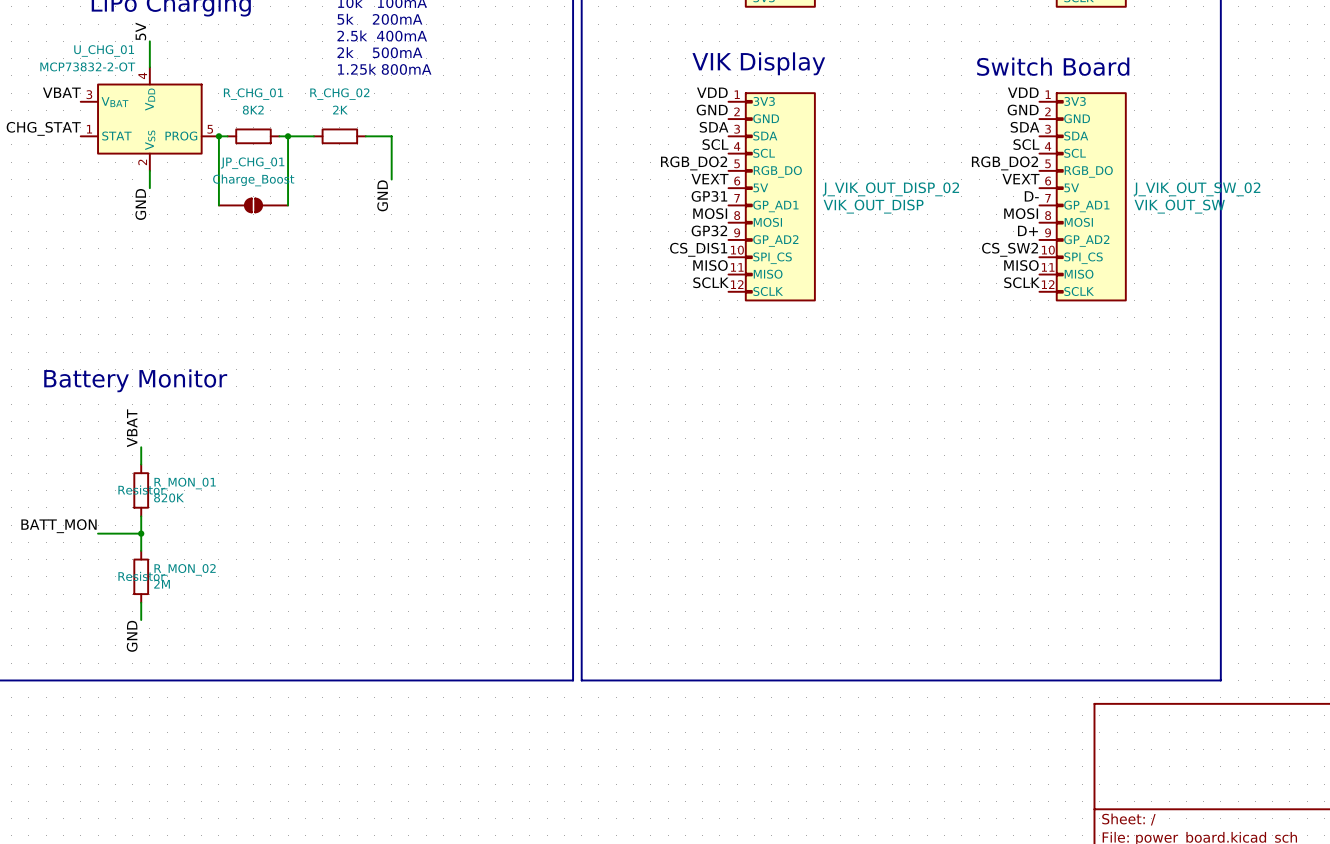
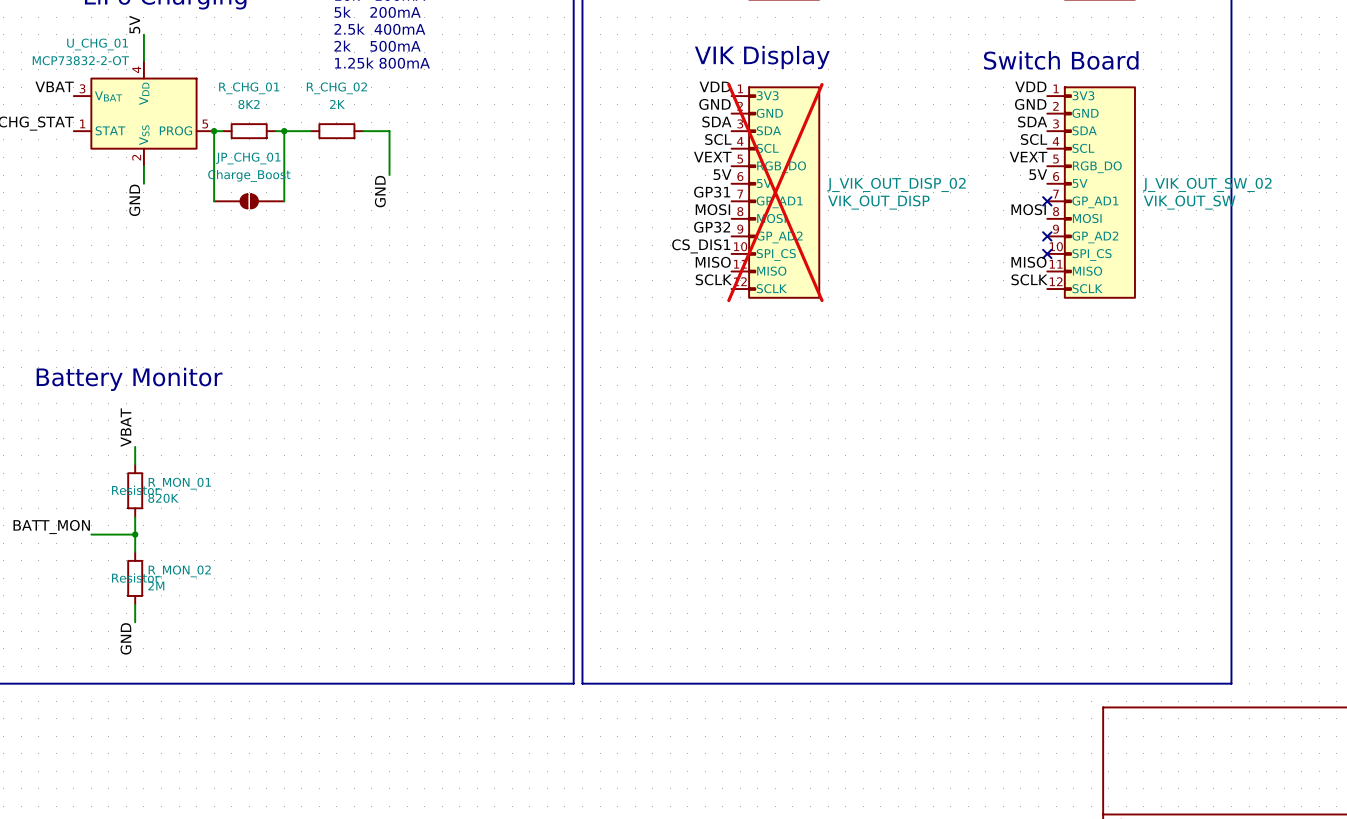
label: RGB_DO2 (694, 163) -> VEXT (712, 157)
label: RGB_DO2 (1004, 163) -> VEXT (1028, 157)
label: VEXT (710, 179) -> 5V (722, 174)
label: VEXT (1020, 179) -> 5V (1038, 174)
J_VIK_OUT_DISP_02 do-not-place cross: none -> (775, 192)
label: D- (1031, 196) -> none
no-connect mark: none -> (1047, 201)
label: D+ (1027, 230) -> none
no-connect mark: none -> (1047, 236)
label: CS_SW2 (1010, 249) -> none
no-connect mark: none -> (1047, 253)

